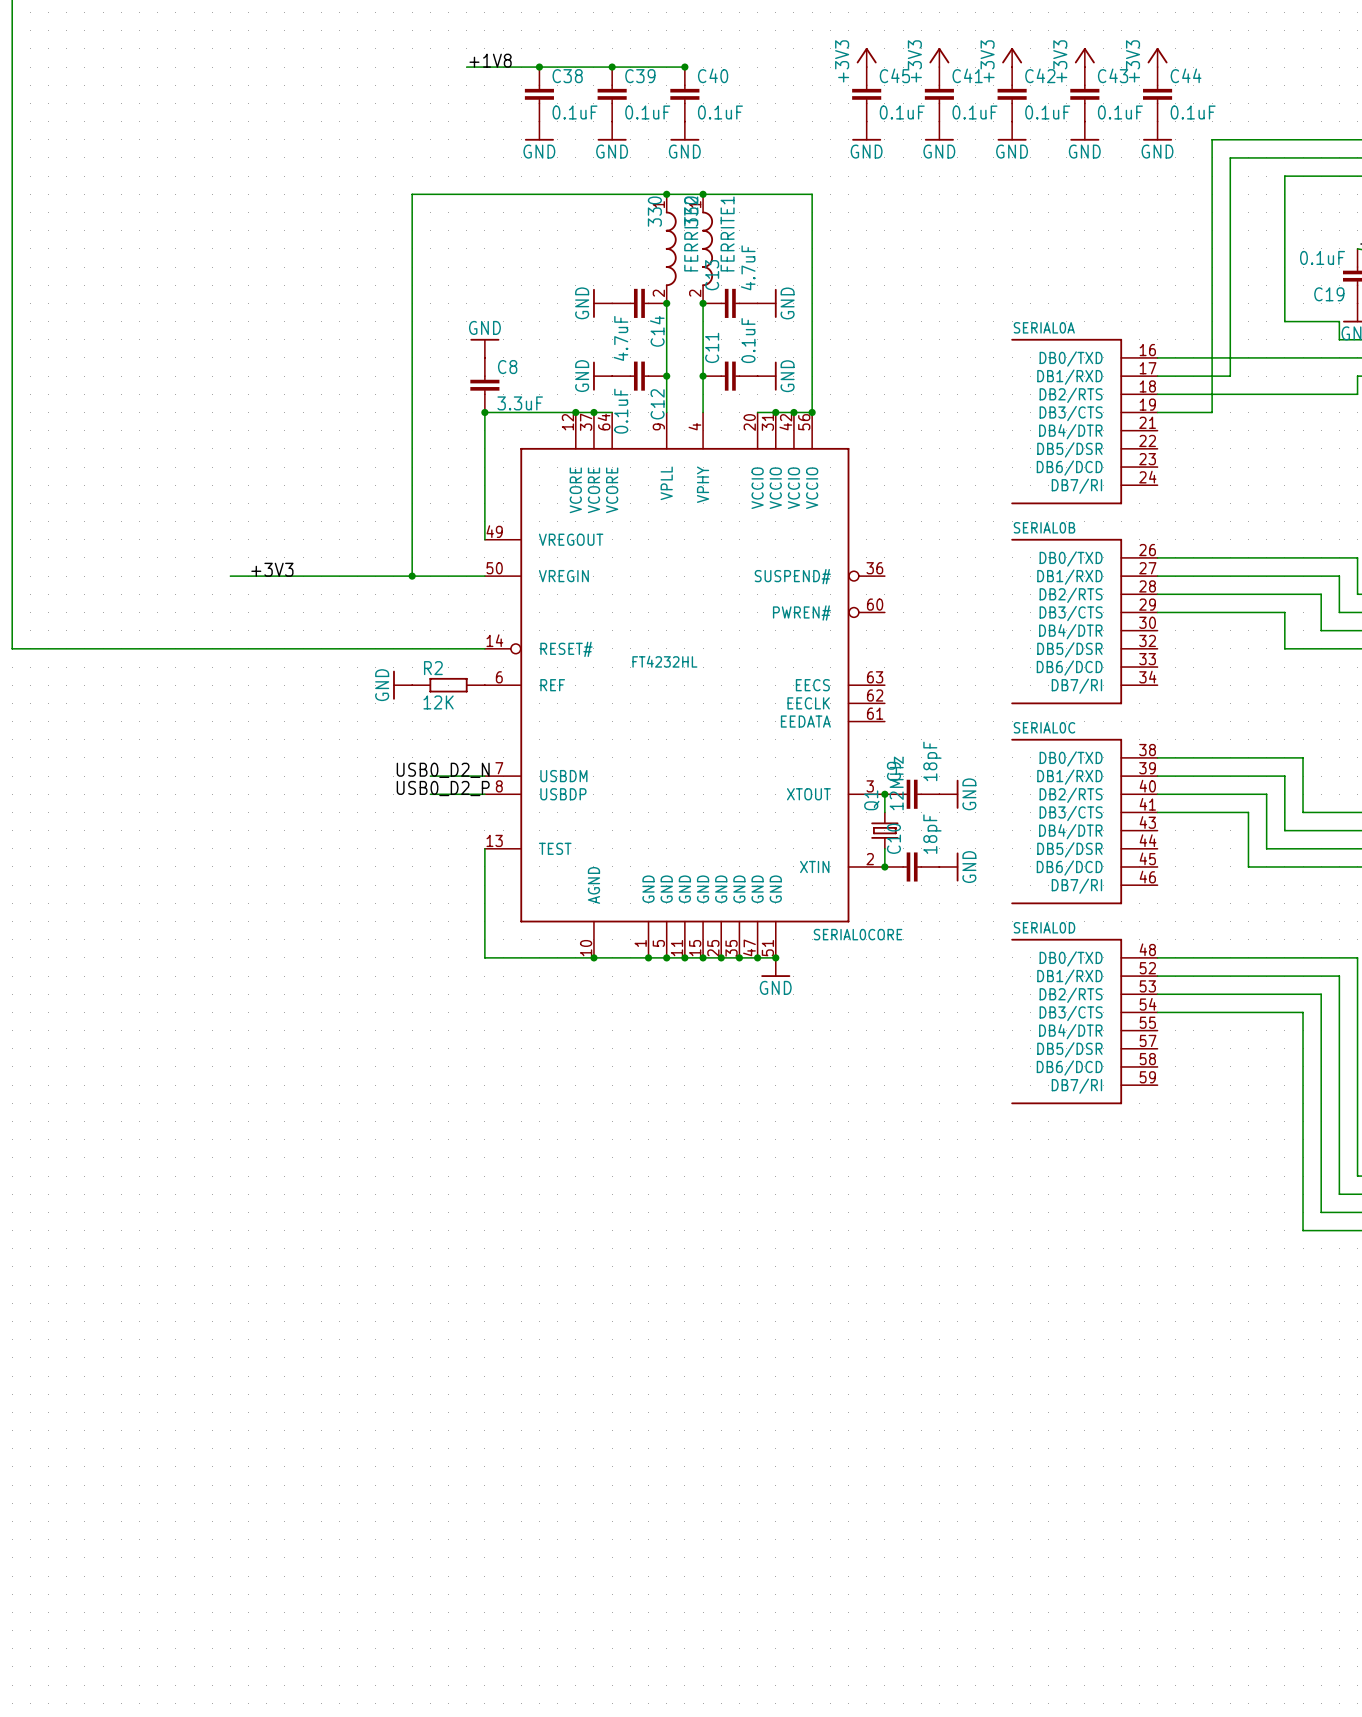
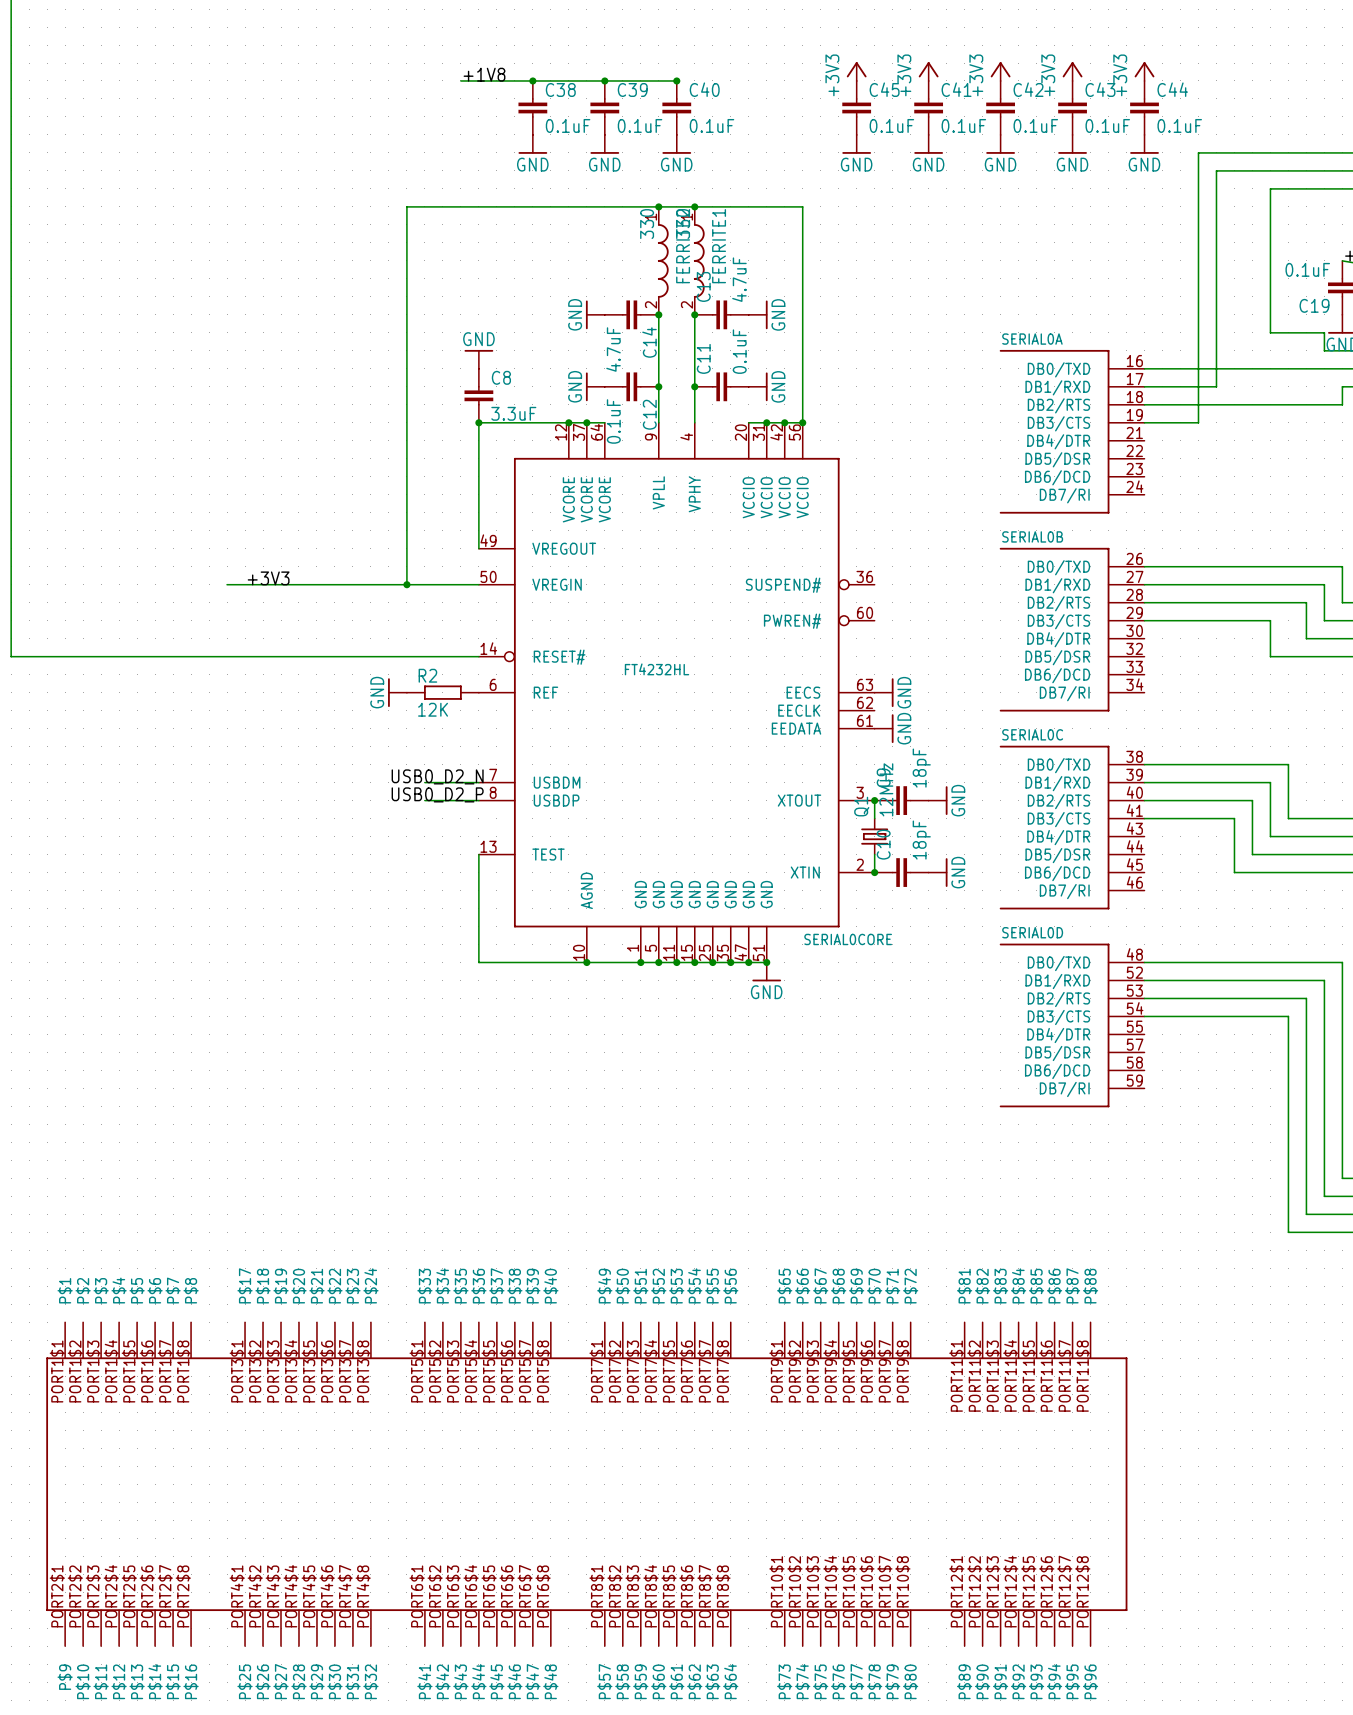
power symbol: none -> GND (884, 692)
power symbol: none -> GND (884, 728)
part: none -> (586, 1484)

